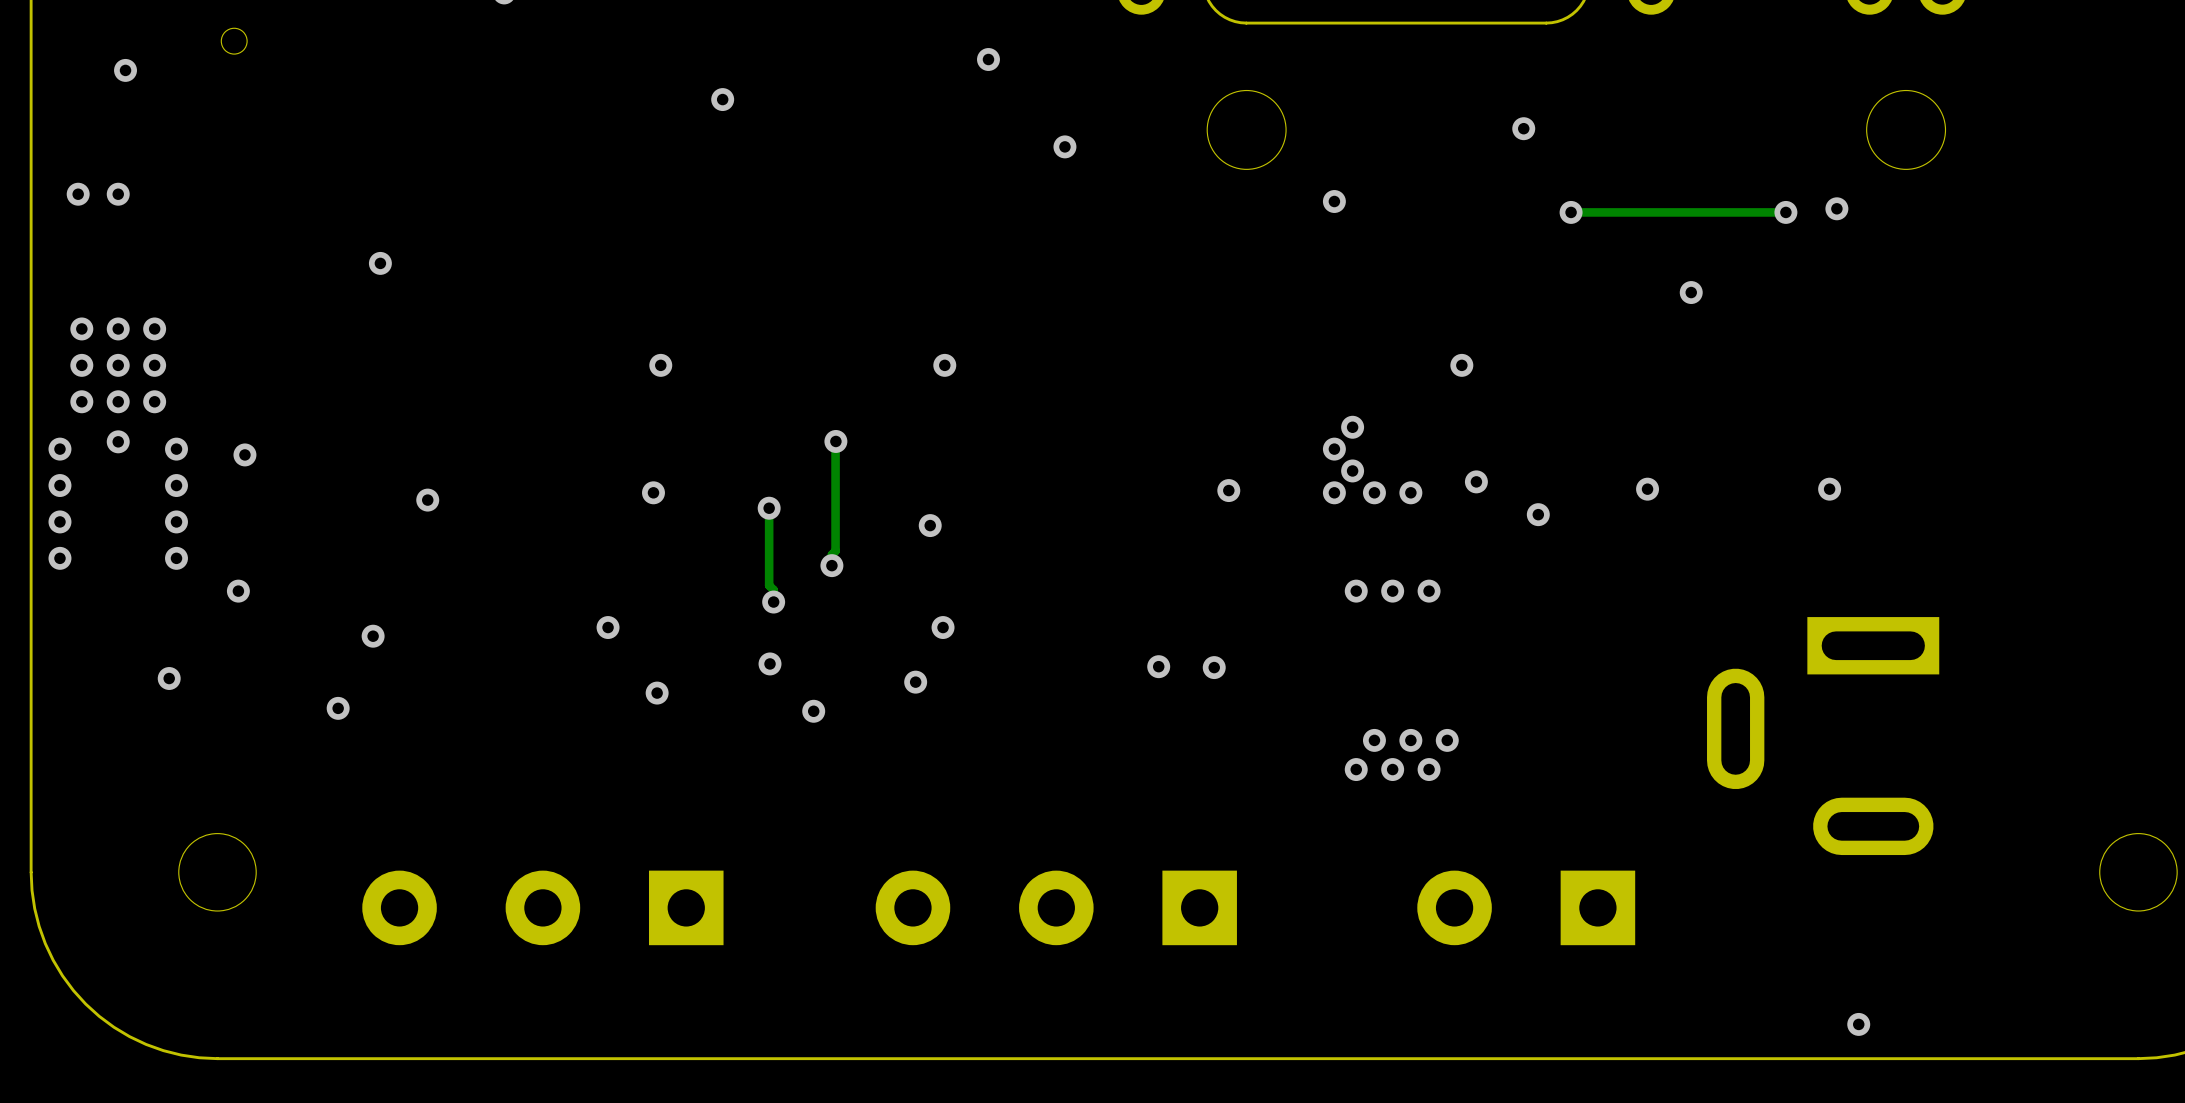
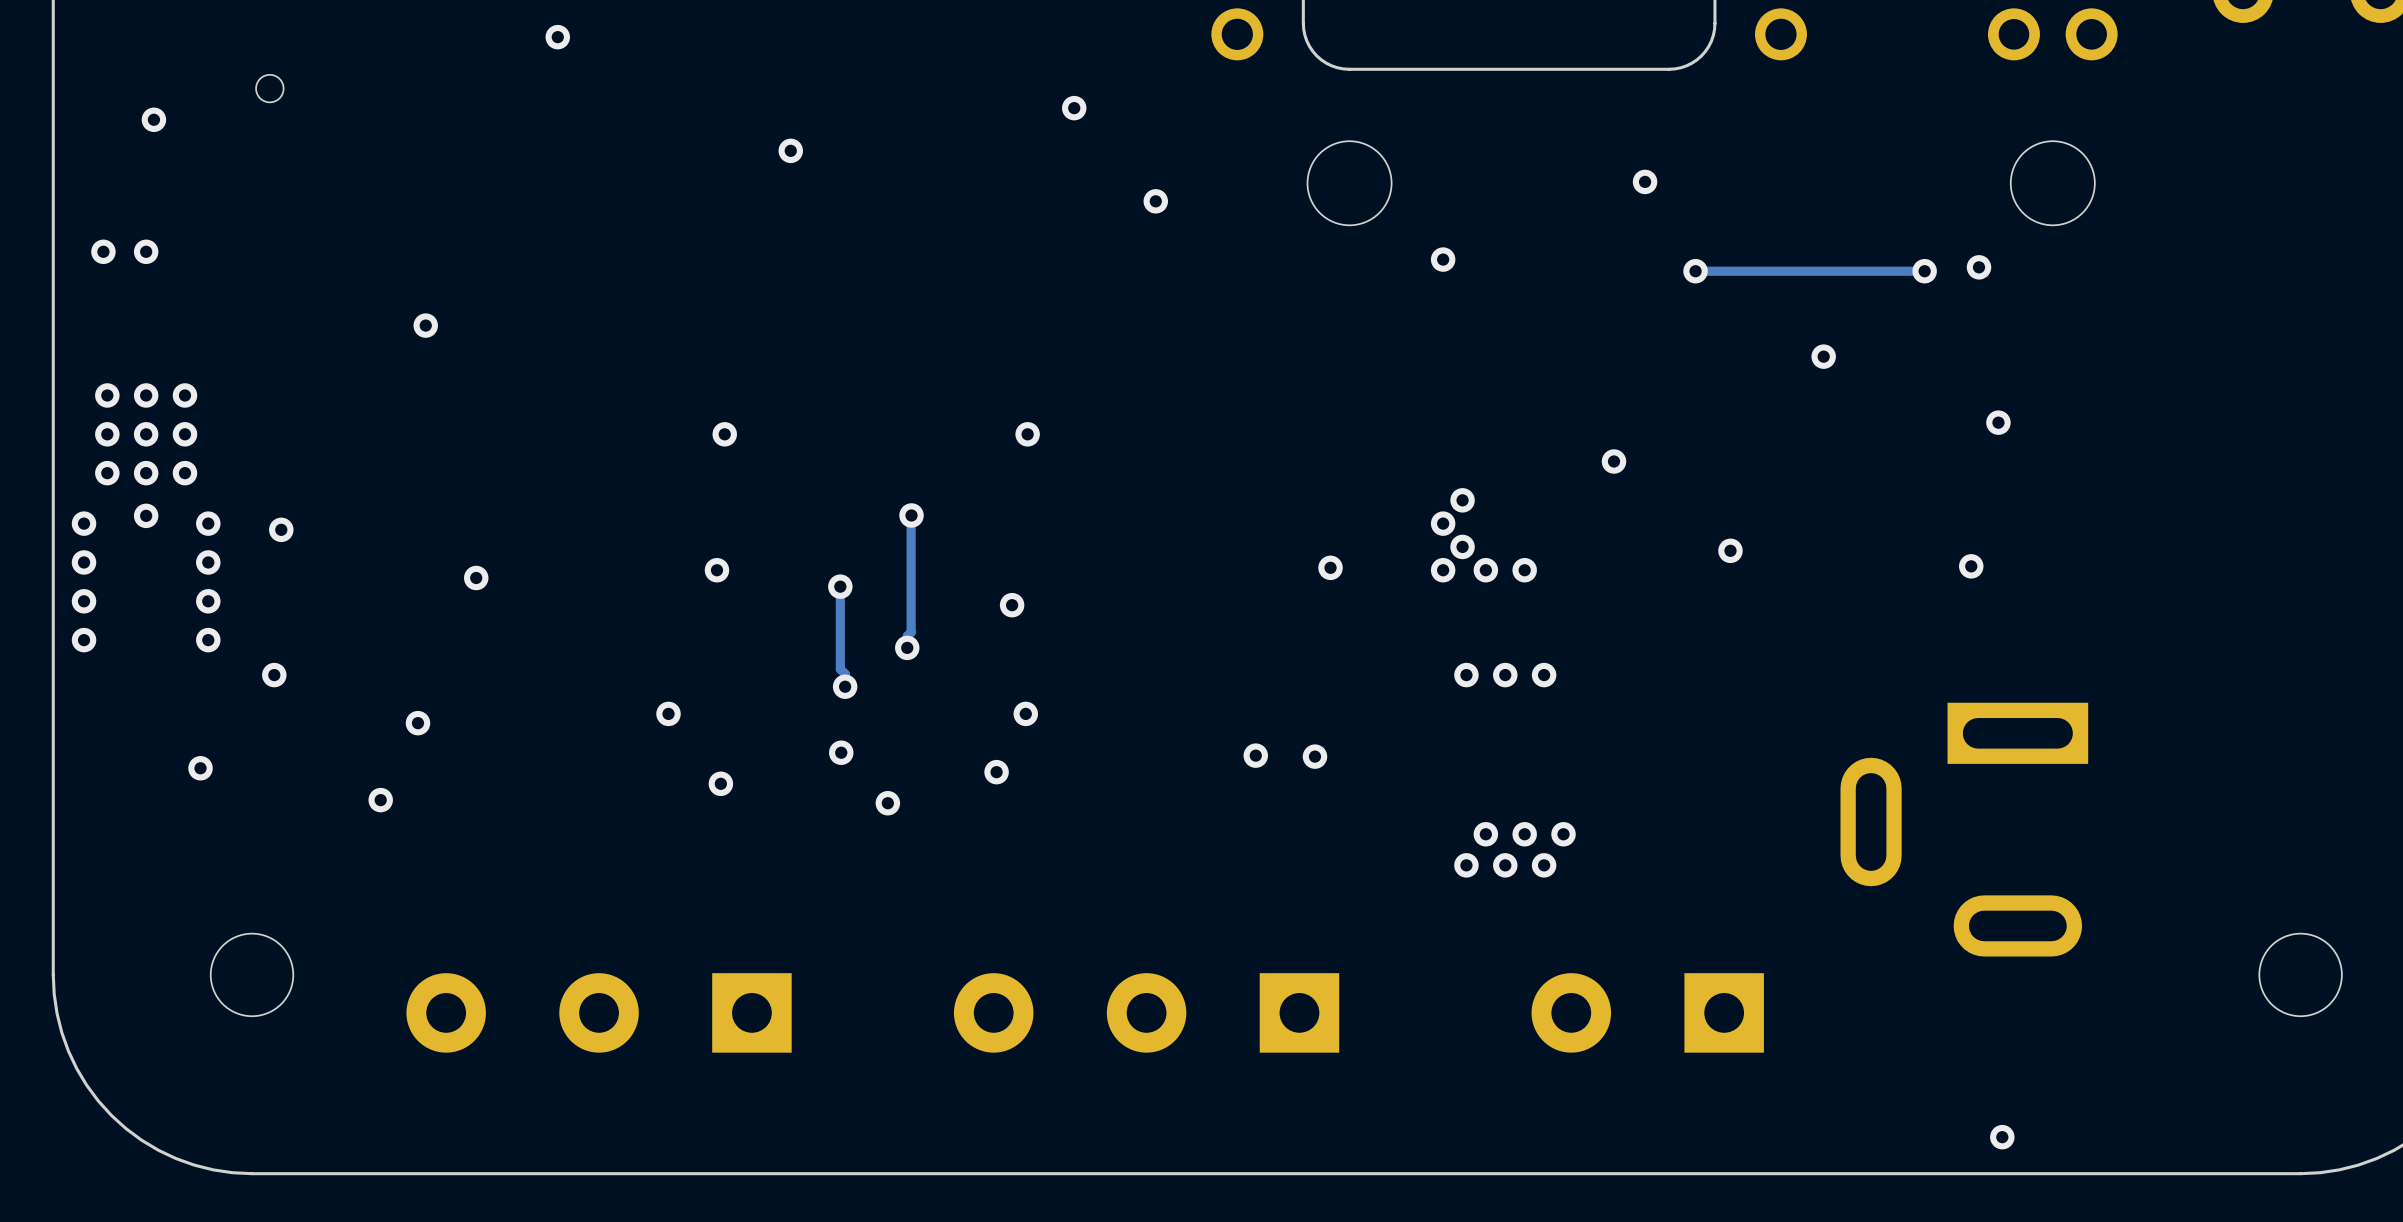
via: none -> (1998, 422)
via position: (1461, 365) -> (1614, 461)
via: none -> (1730, 550)
via: (1476, 481) -> none
via: (1647, 489) -> none
via: (1538, 514) -> none

